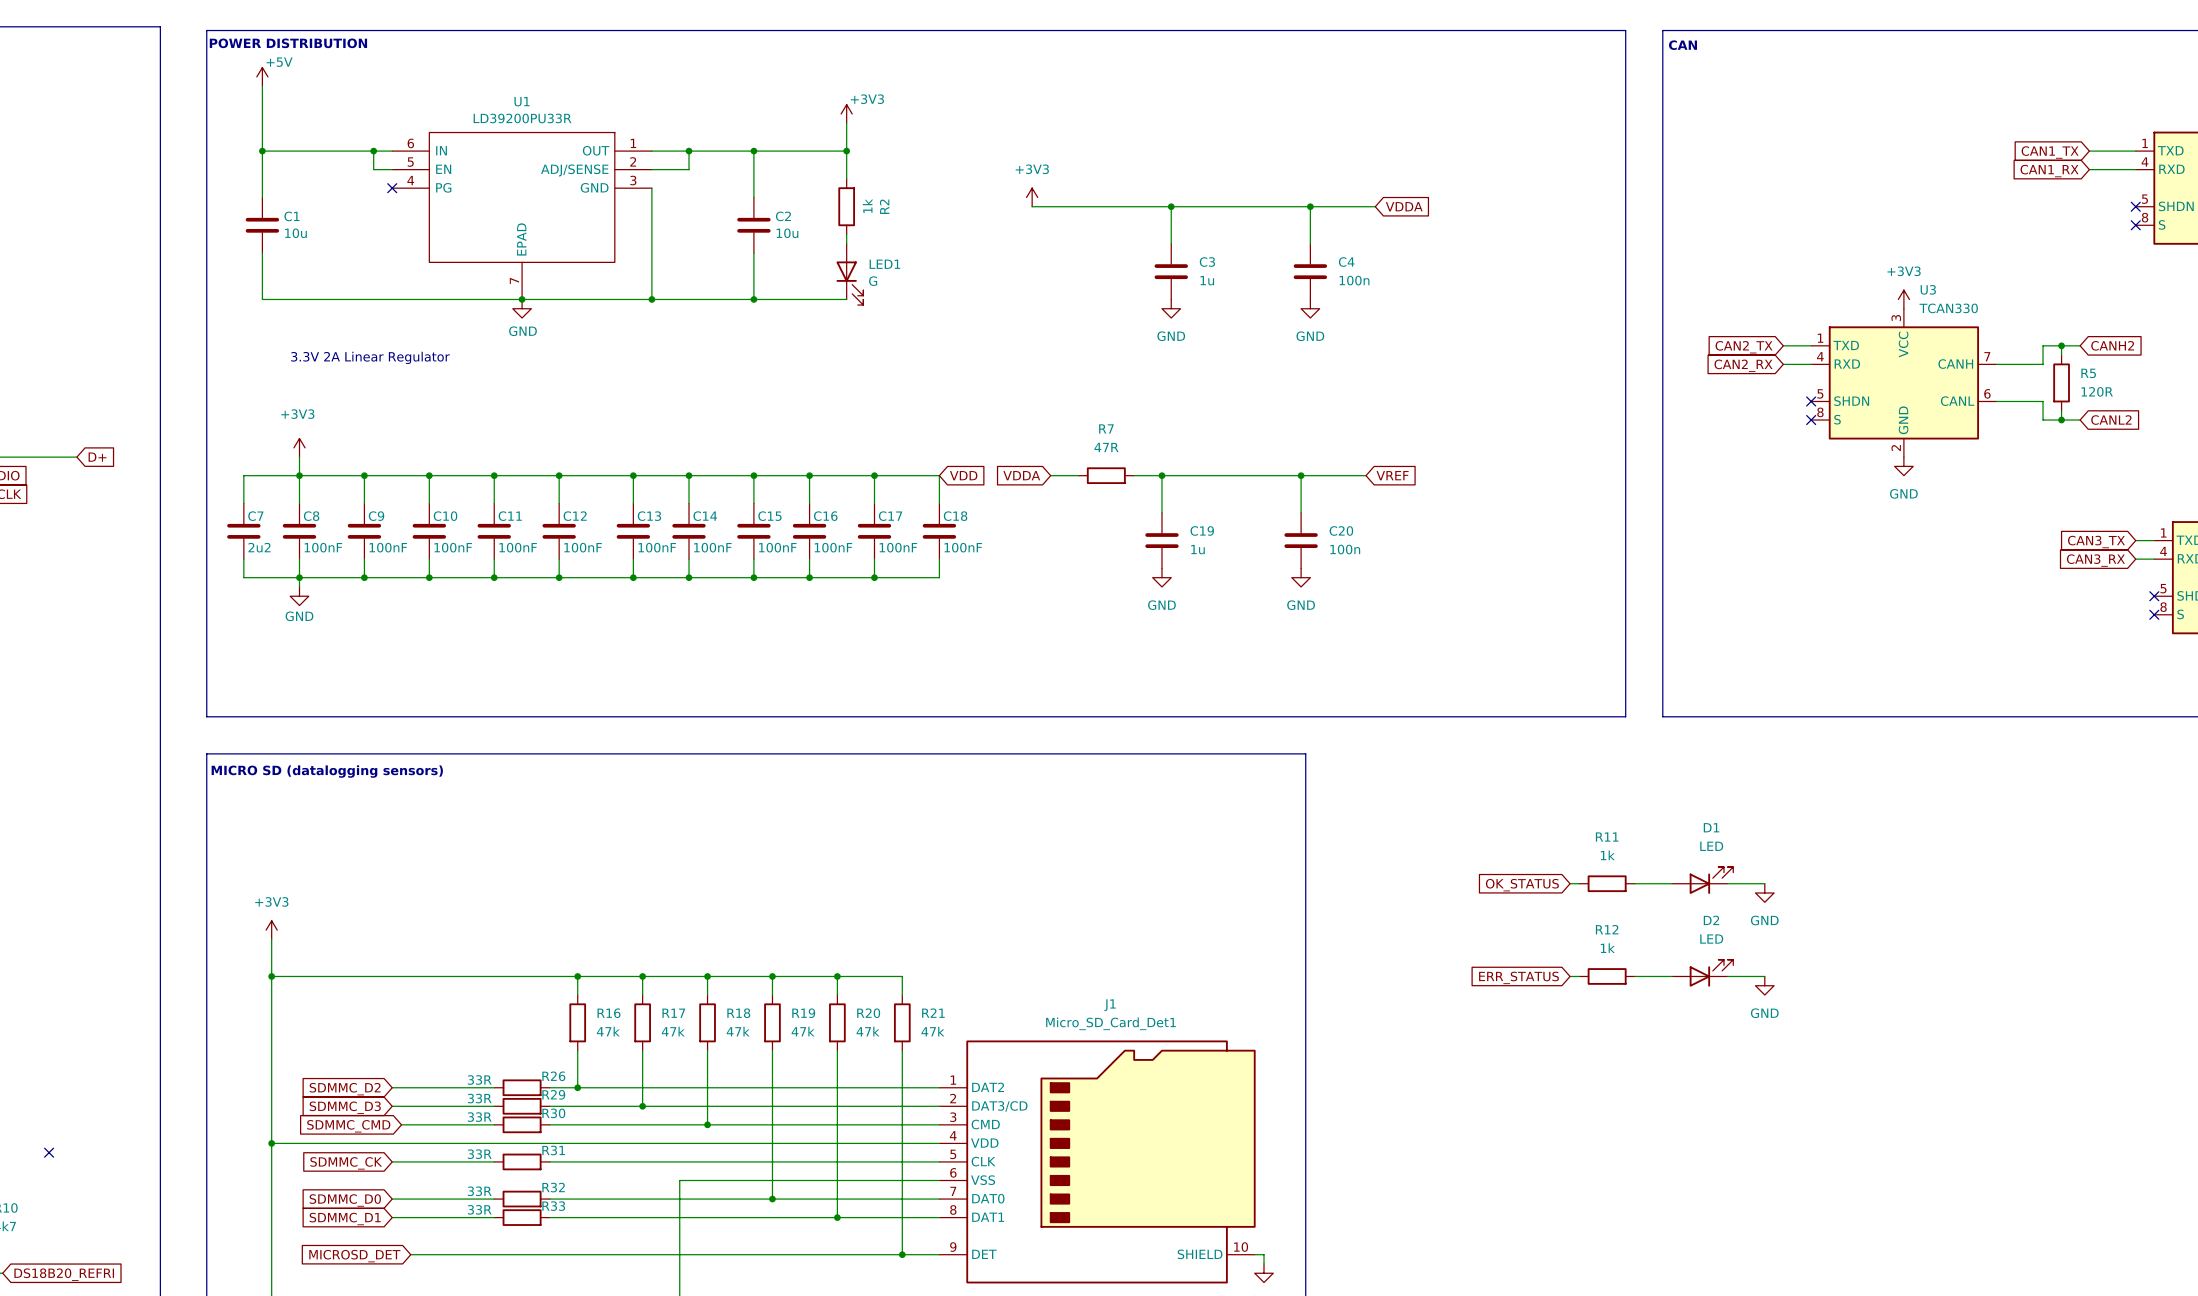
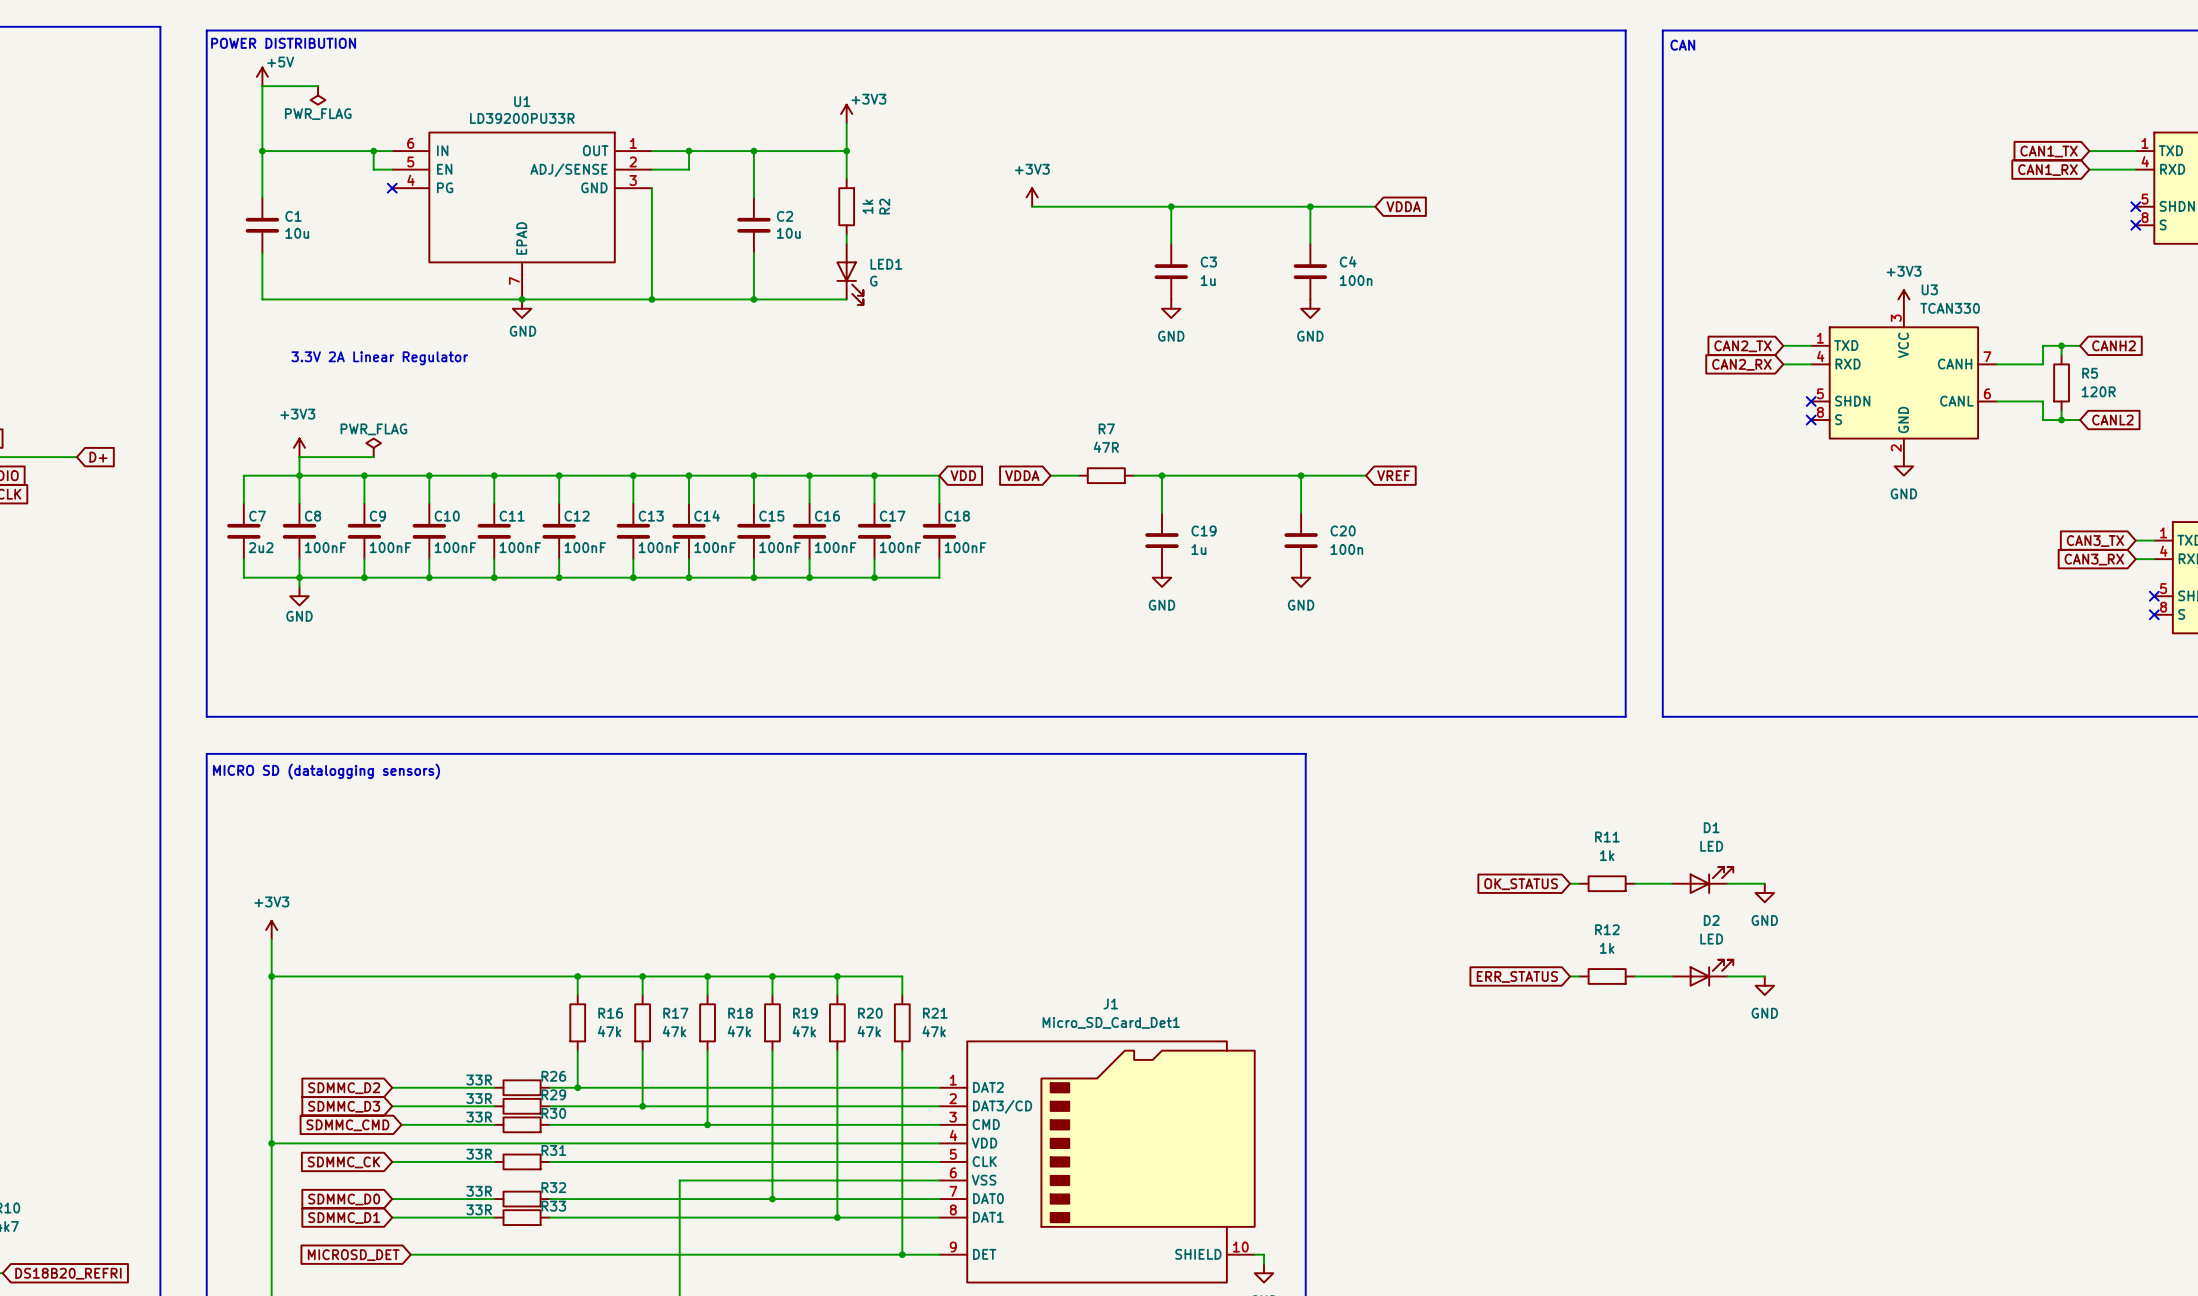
wire: none -> (262, 86) (318, 86)
power symbol: none -> PWR_FLAG (318, 95)
power symbol: none -> PWR_FLAG (373, 447)
wire: none -> (299, 457) (373, 457)
no-connect mark: (49, 1152) -> none

